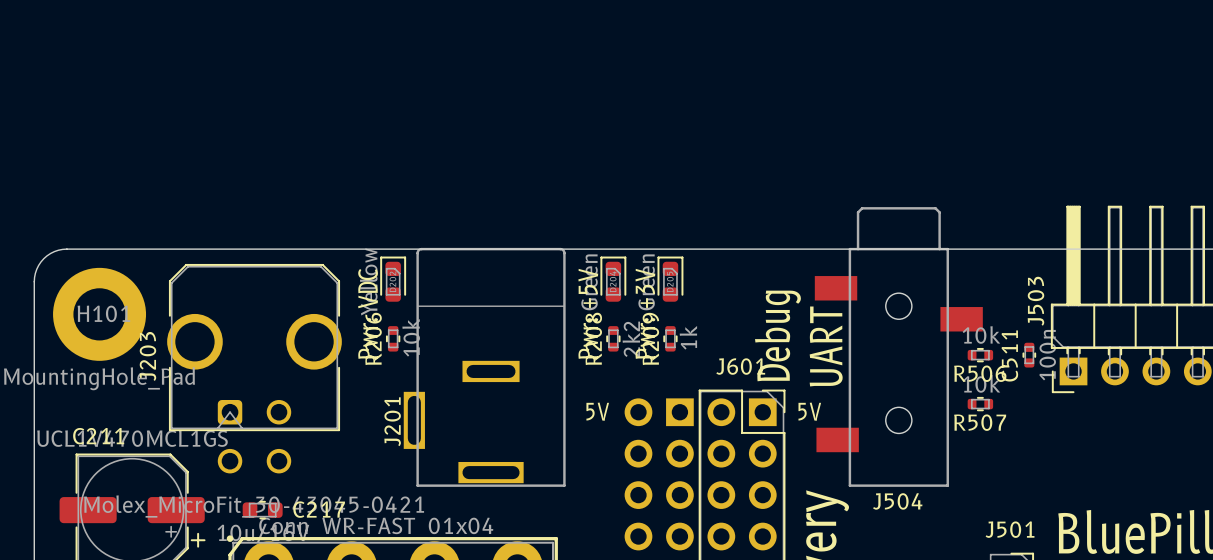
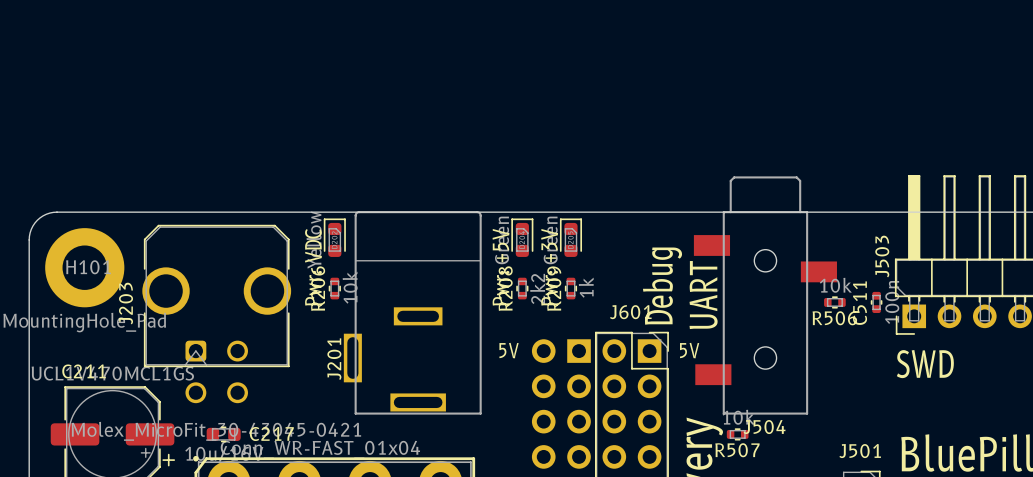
R507 position: (980, 404) -> (737, 434)
text: none -> SWD (925, 364)

